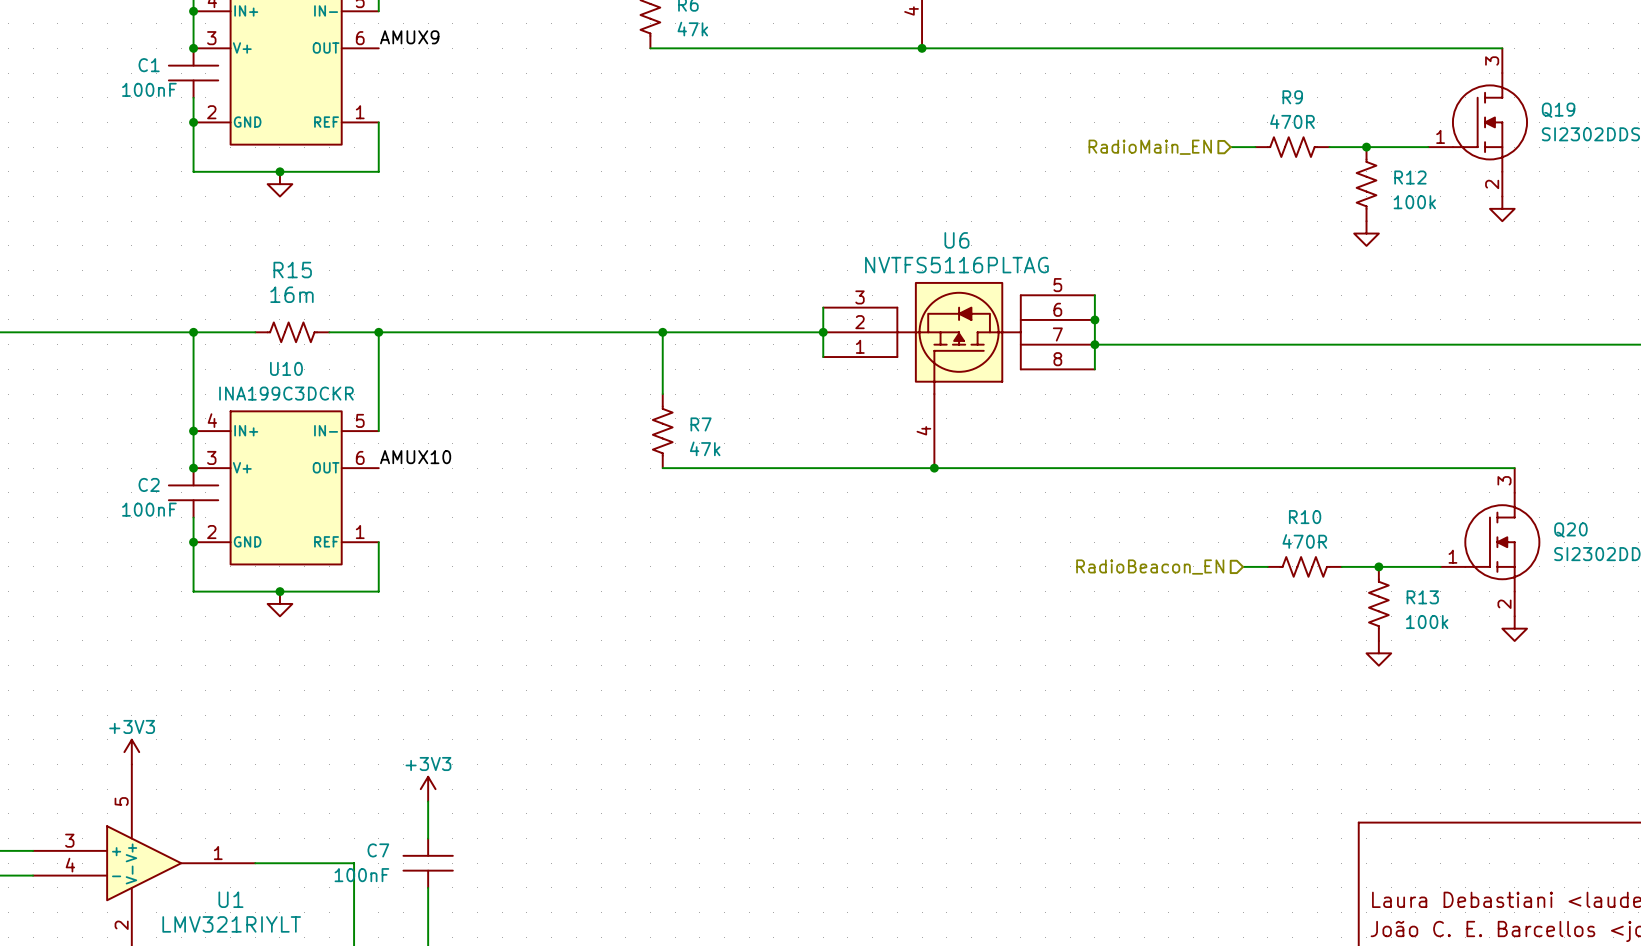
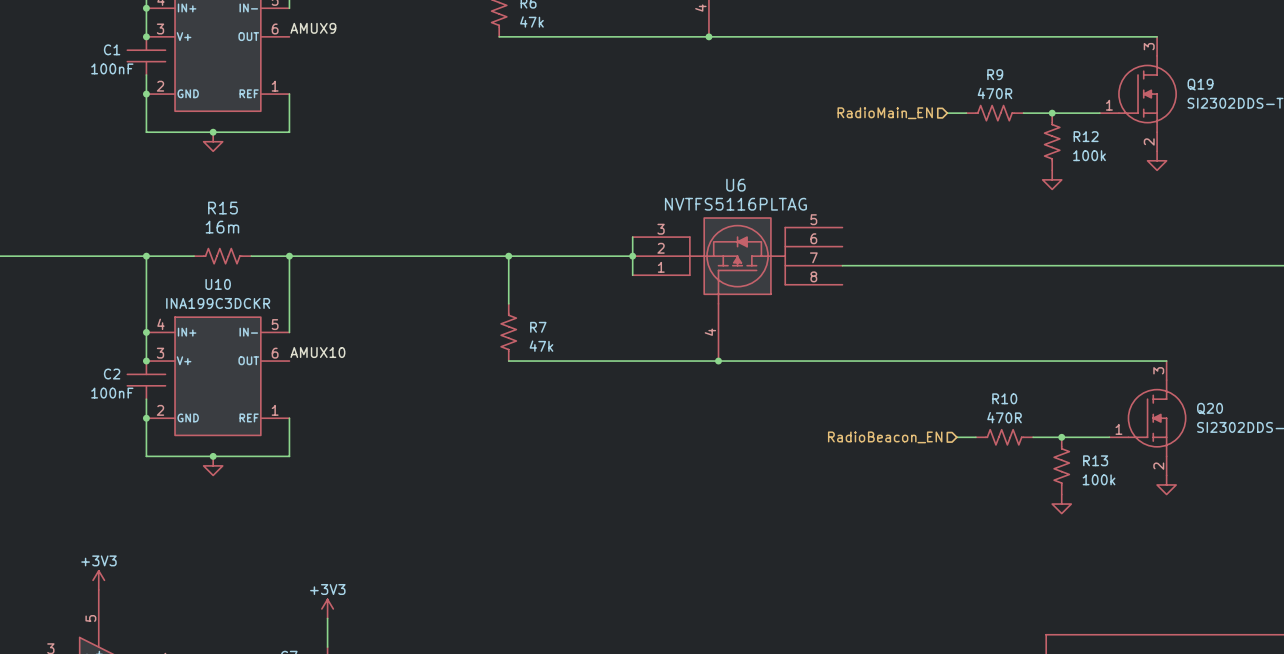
wire: (1094, 295) (1094, 369) -> none
junction: (1094, 319) -> none
junction: (1094, 344) -> none

